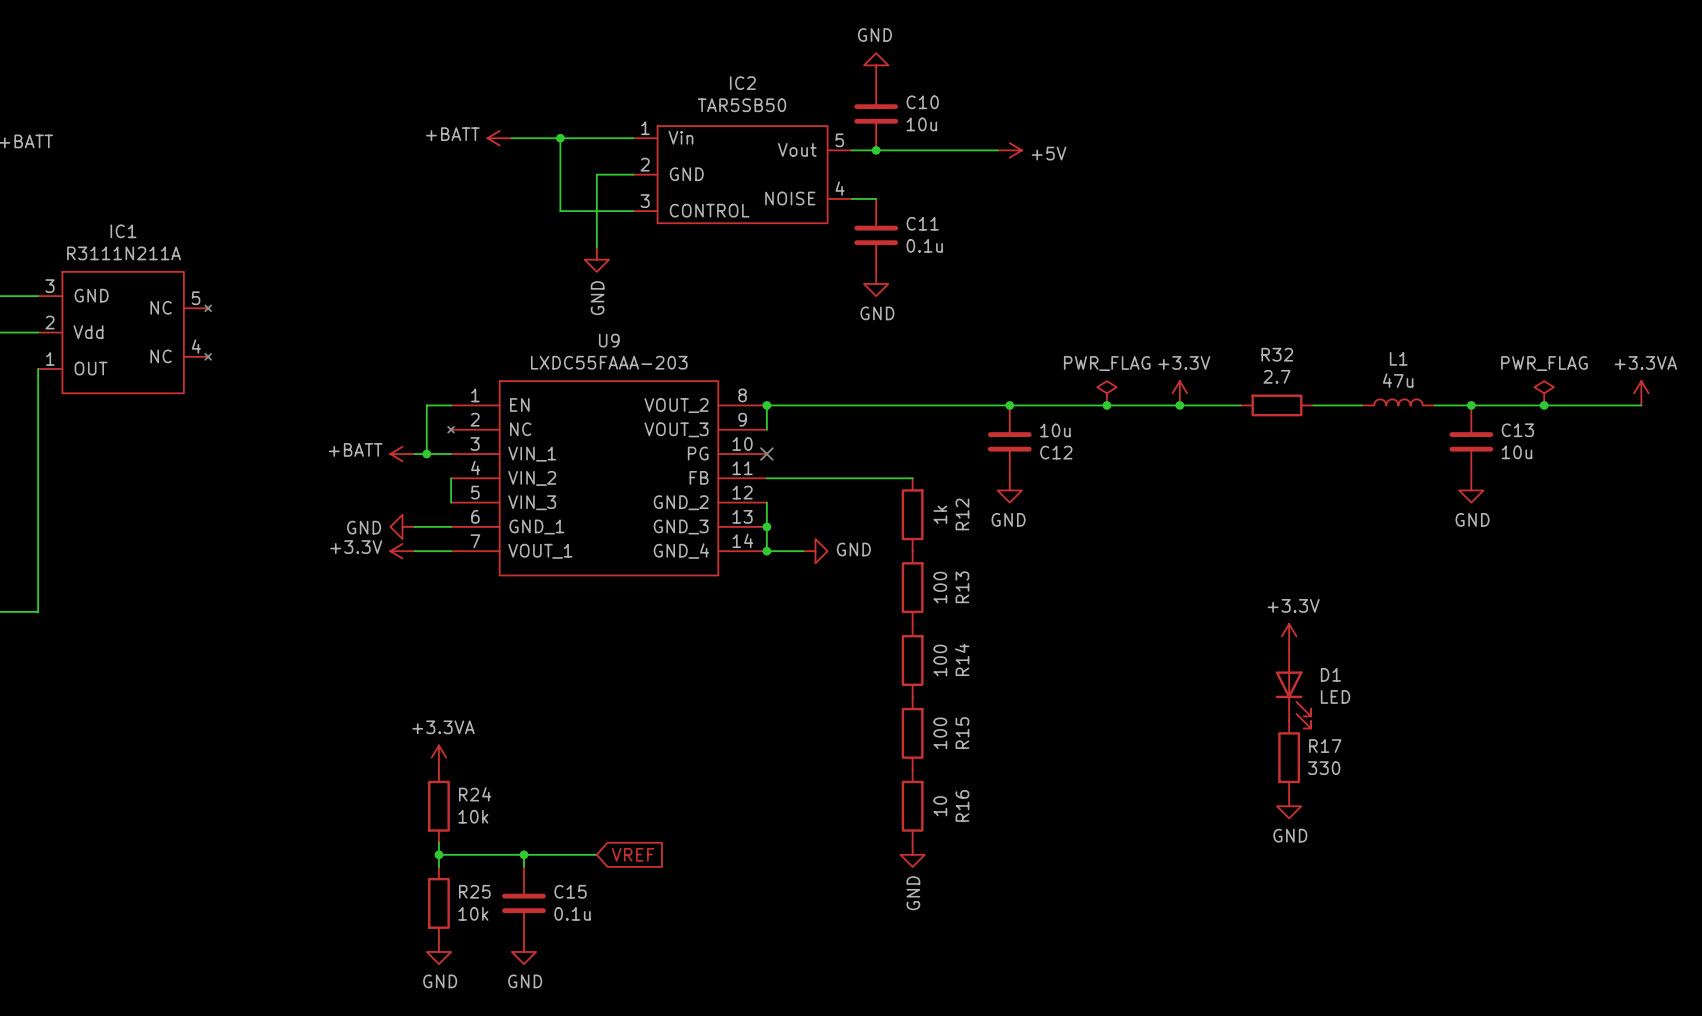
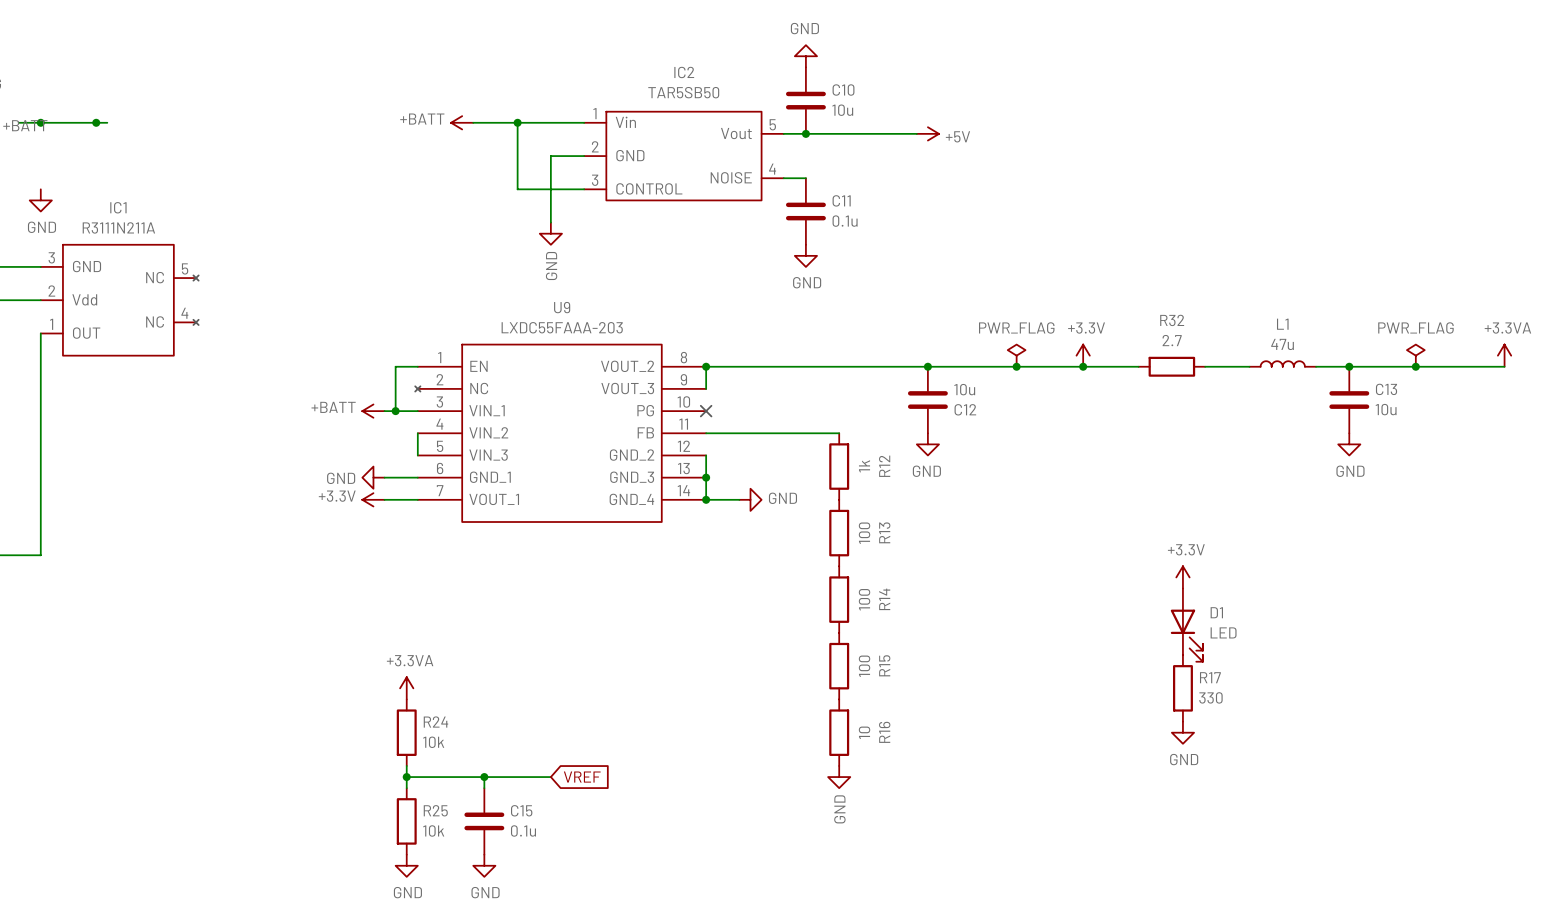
wire: none -> (18, 122) (107, 122)
junction: none -> (40, 122)
junction: none -> (96, 122)
power symbol: none -> GND (40, 200)

